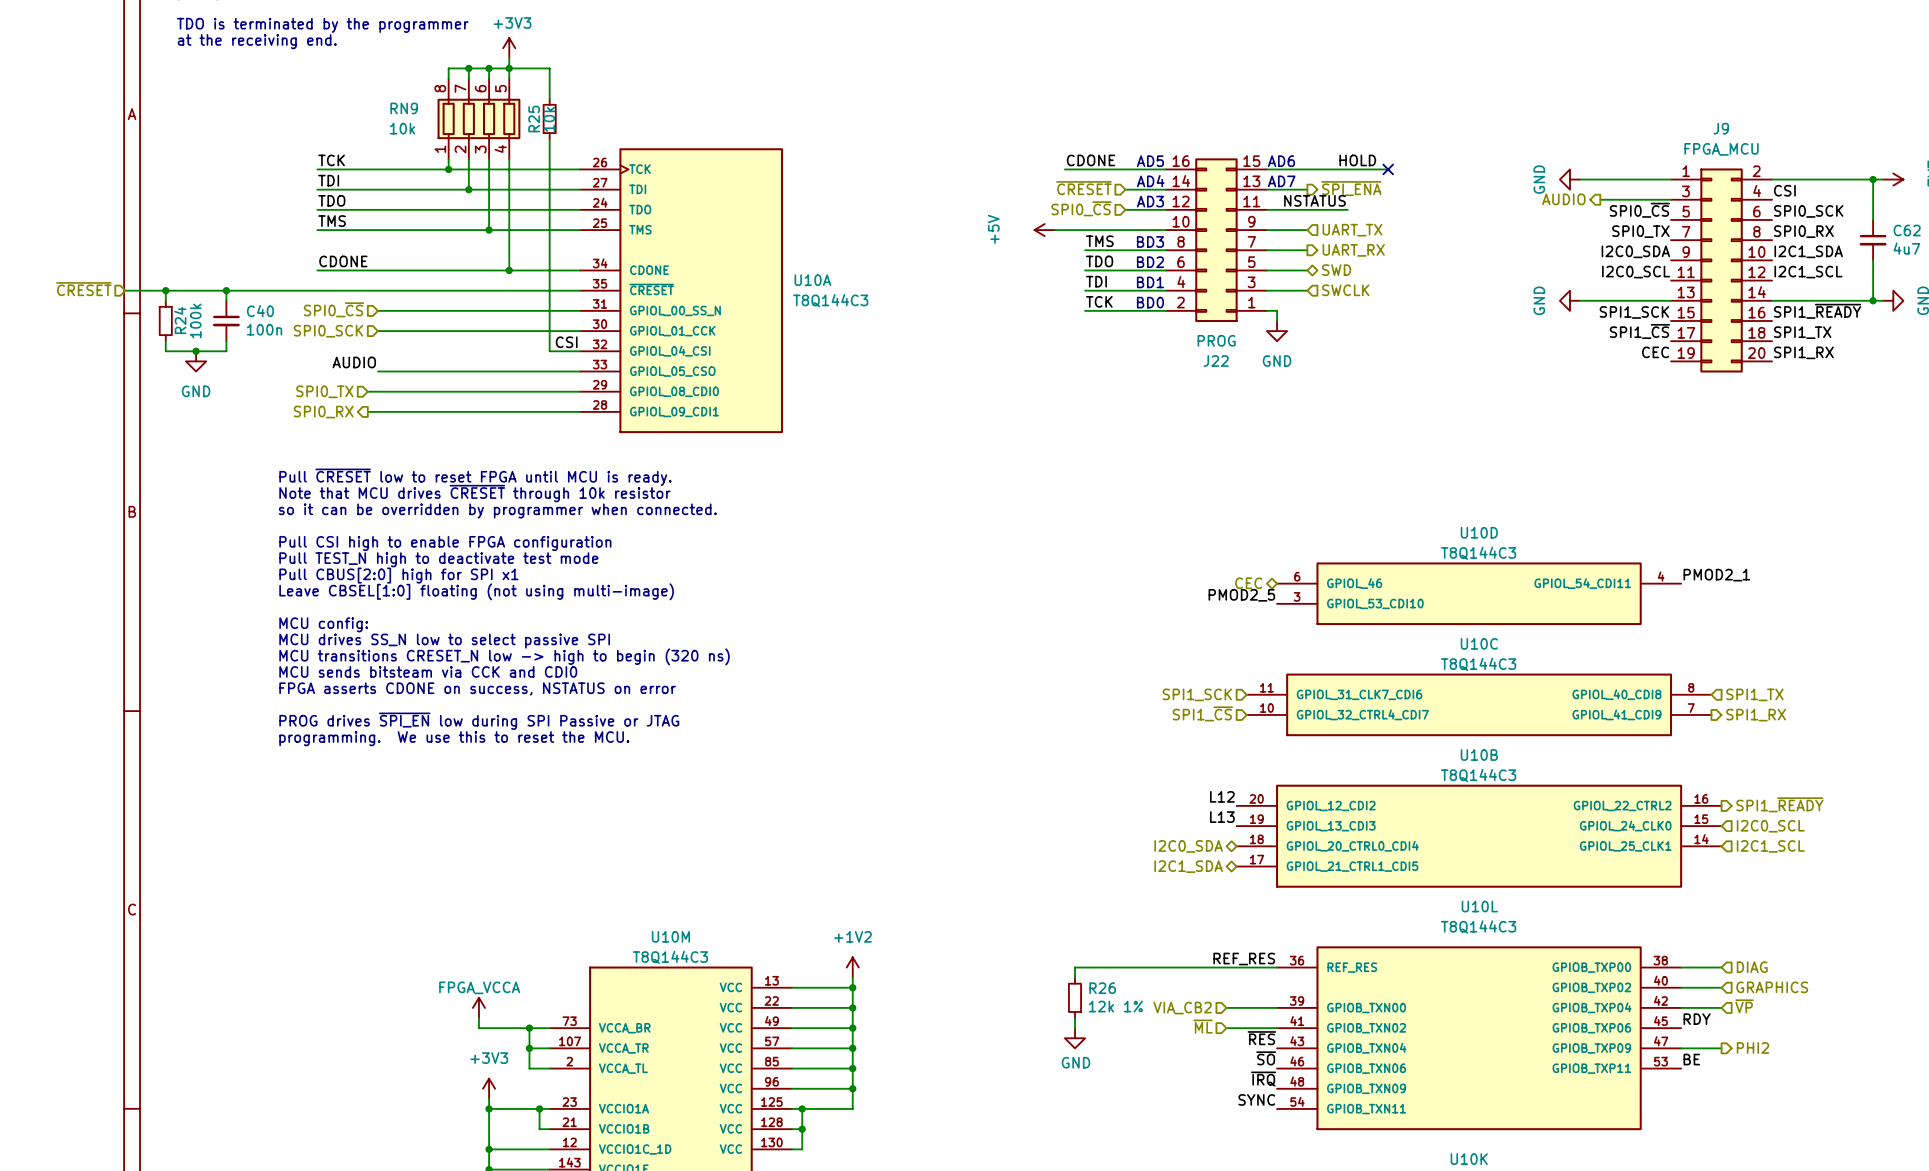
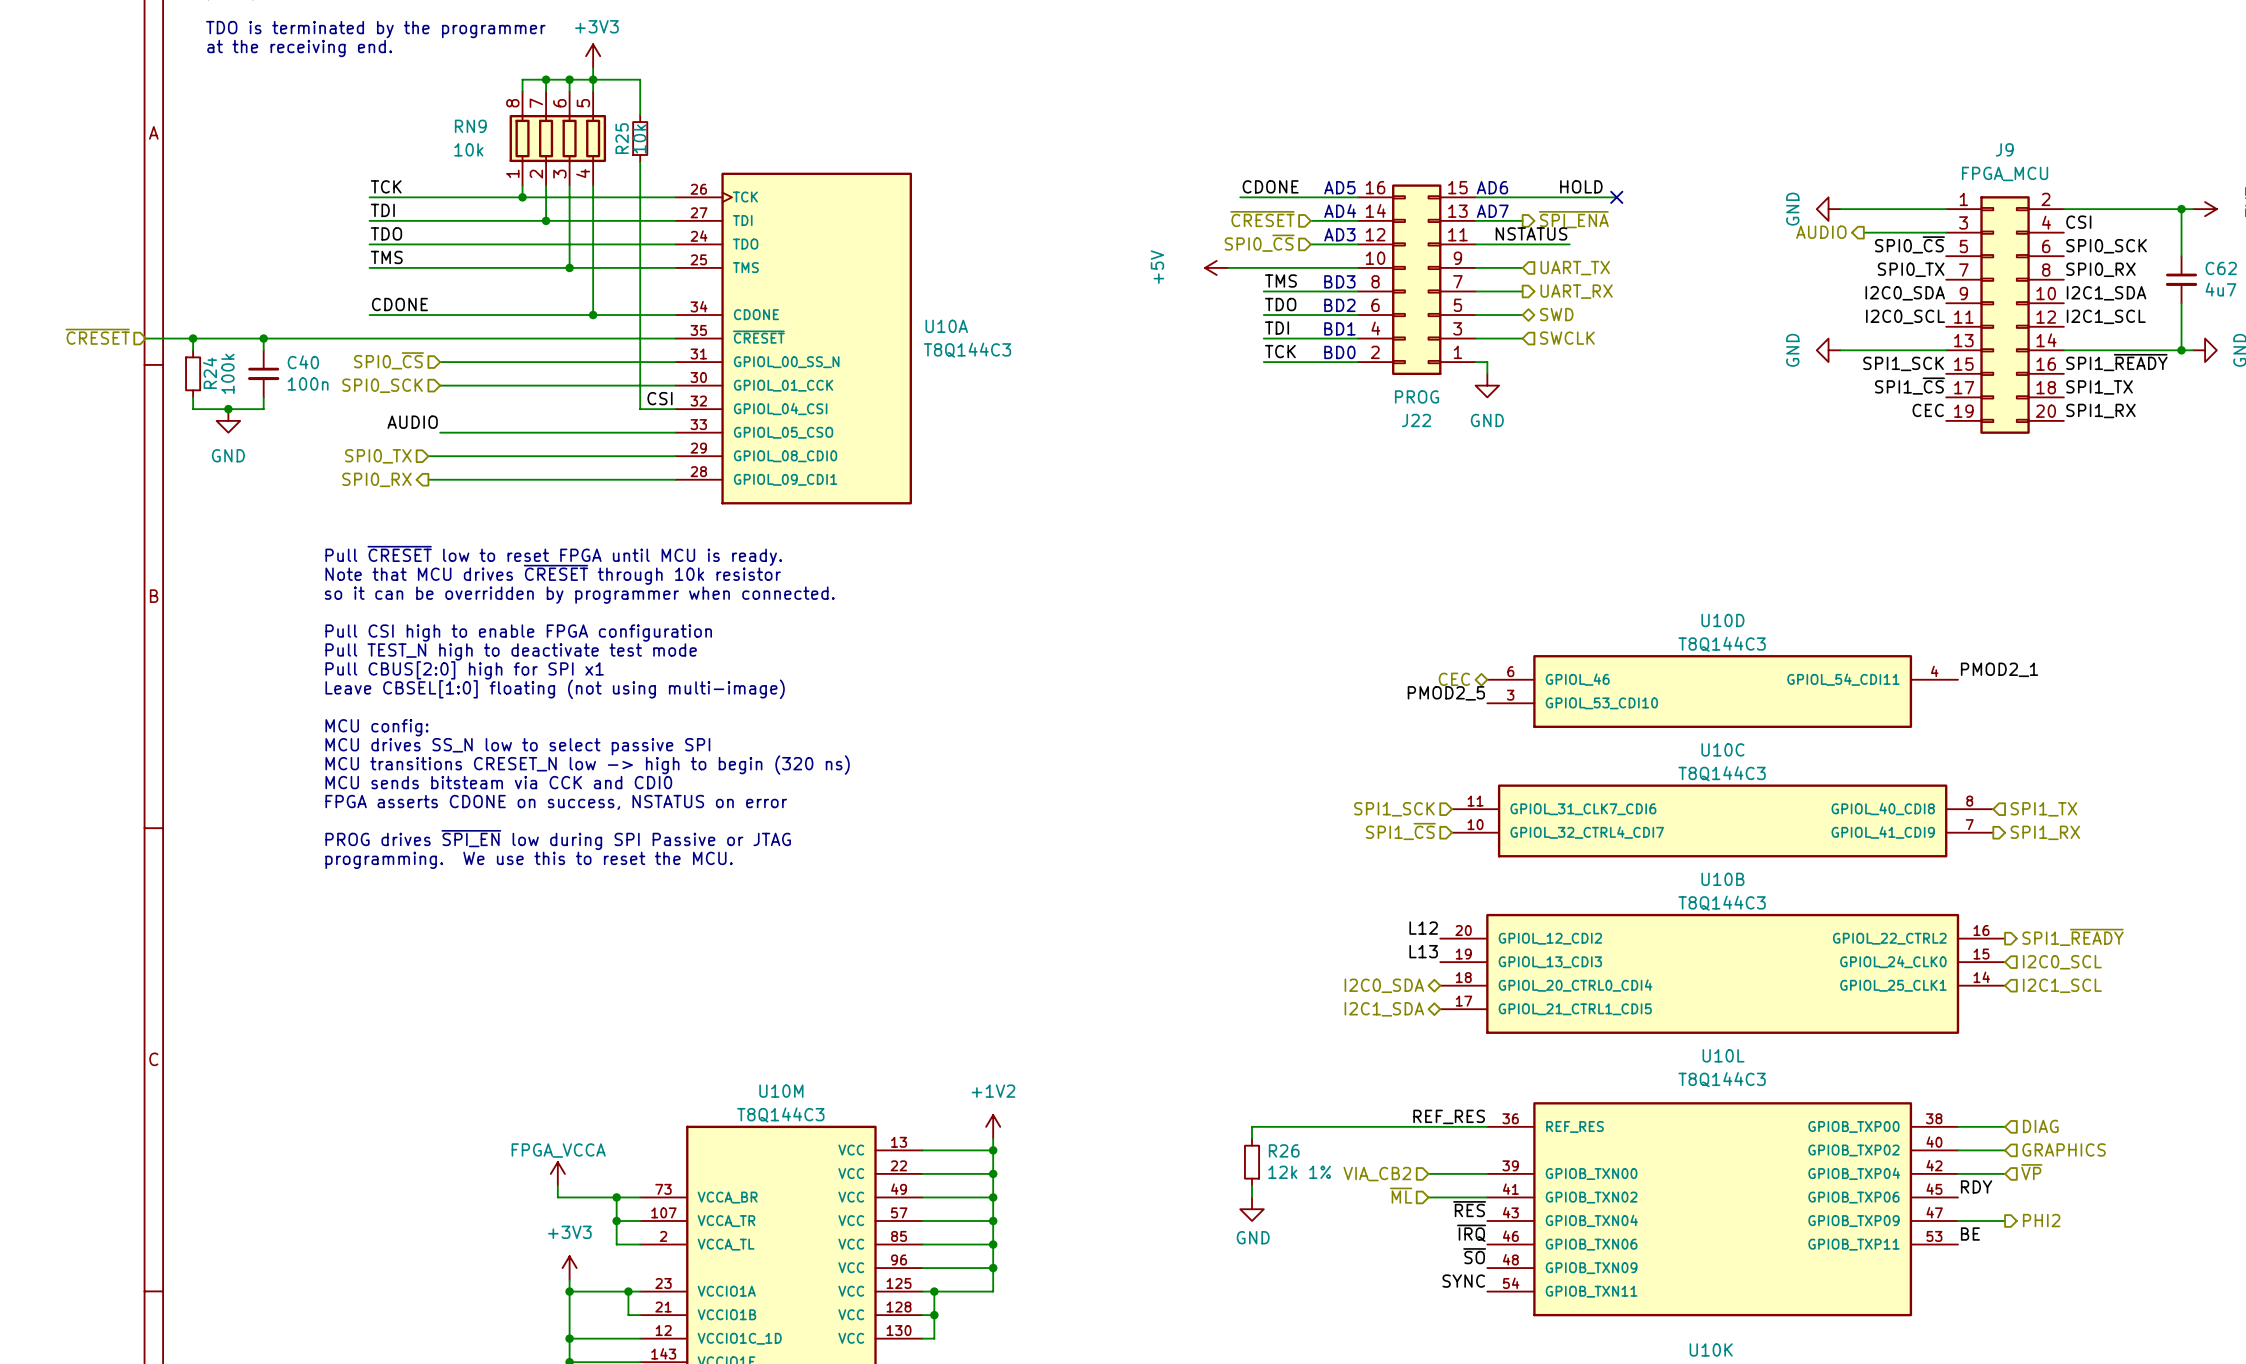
label: ~{SO} (1266, 1058) -> ~{IRQ} (1471, 1233)
label: ~{IRQ} (1263, 1079) -> ~{SO} (1474, 1256)

